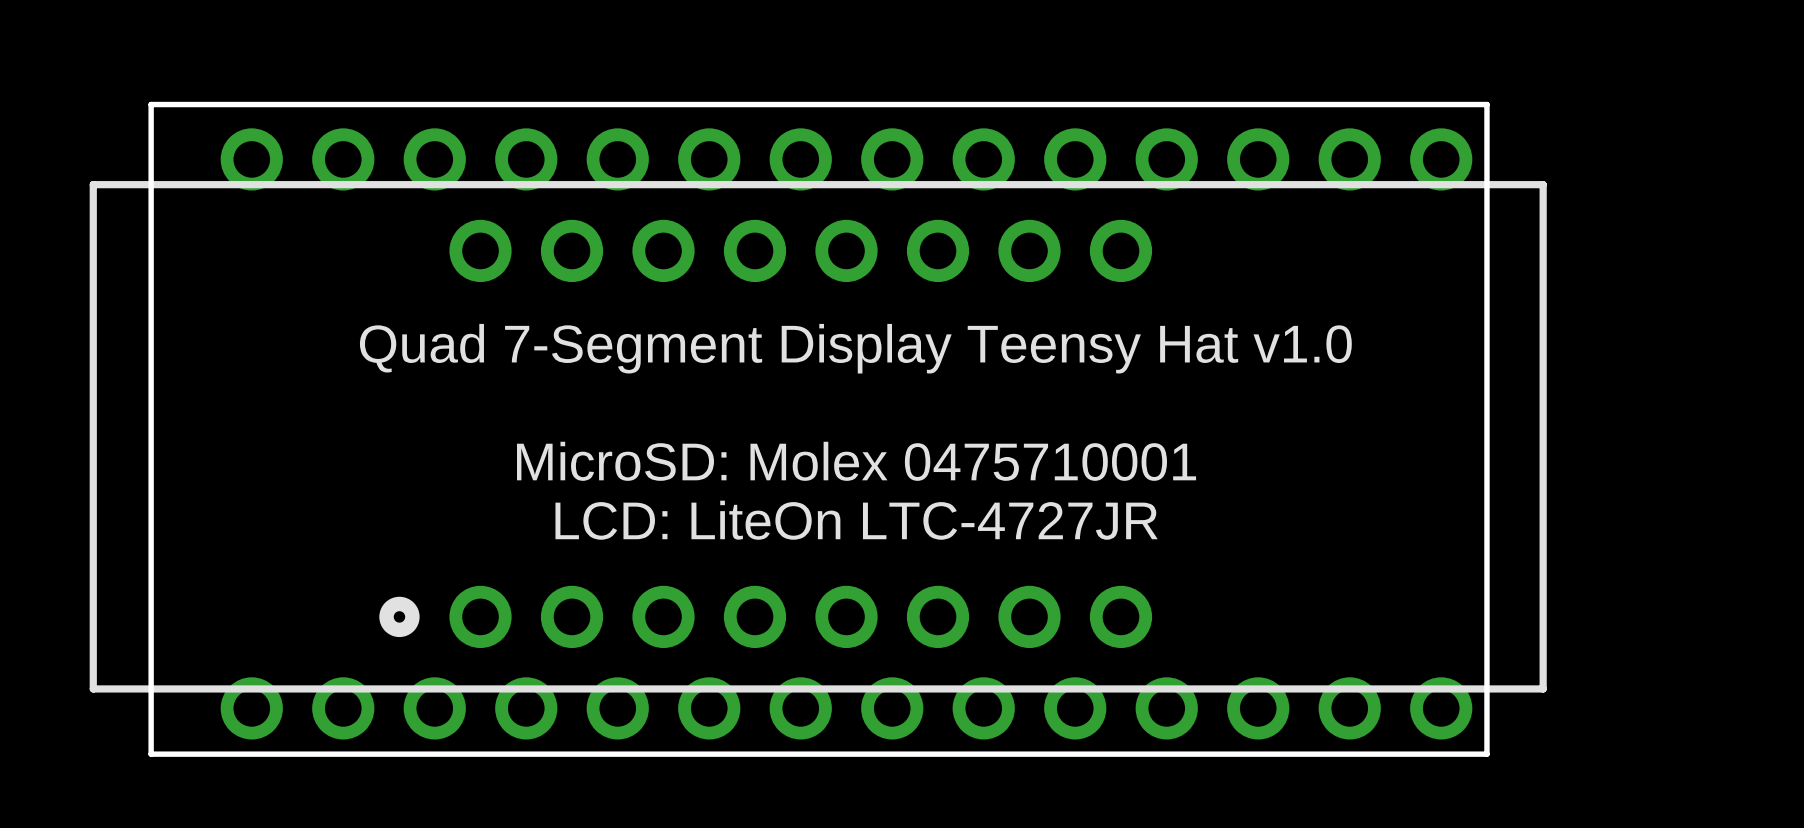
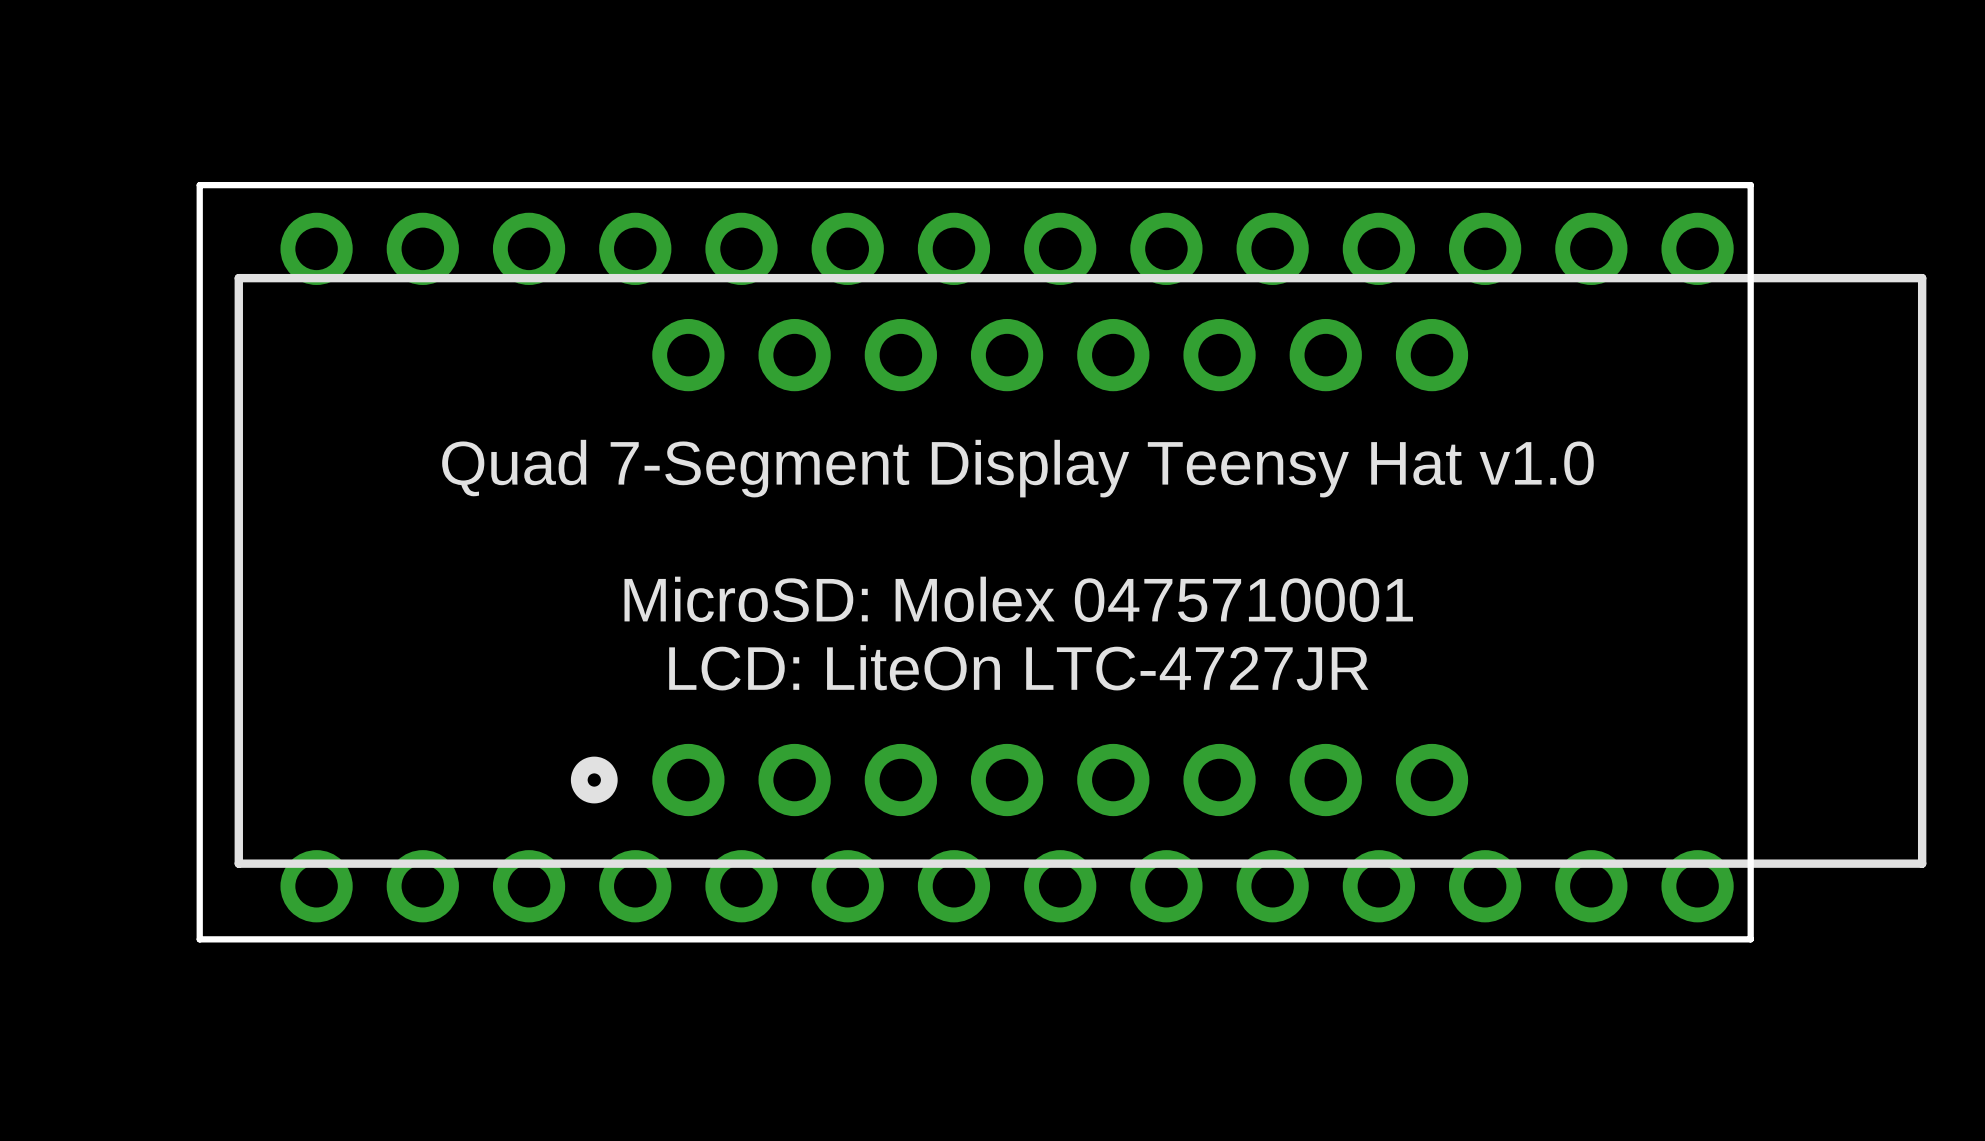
part position: (818, 436) -> (1080, 570)

